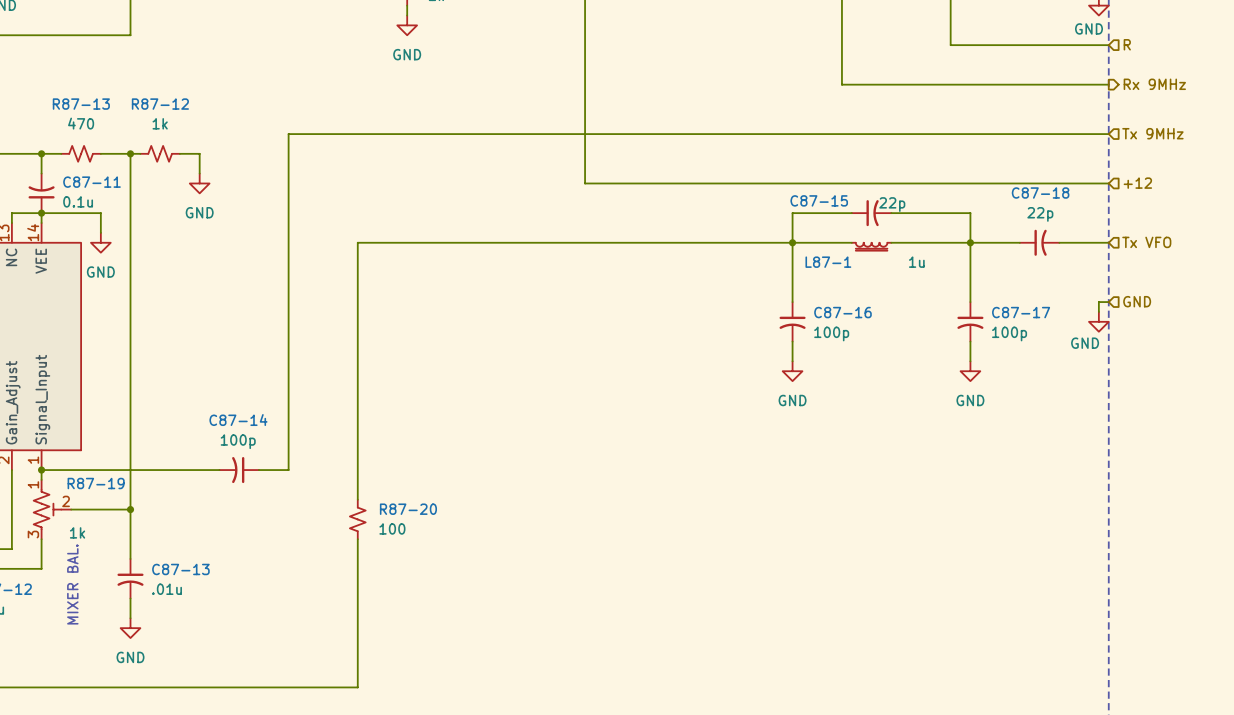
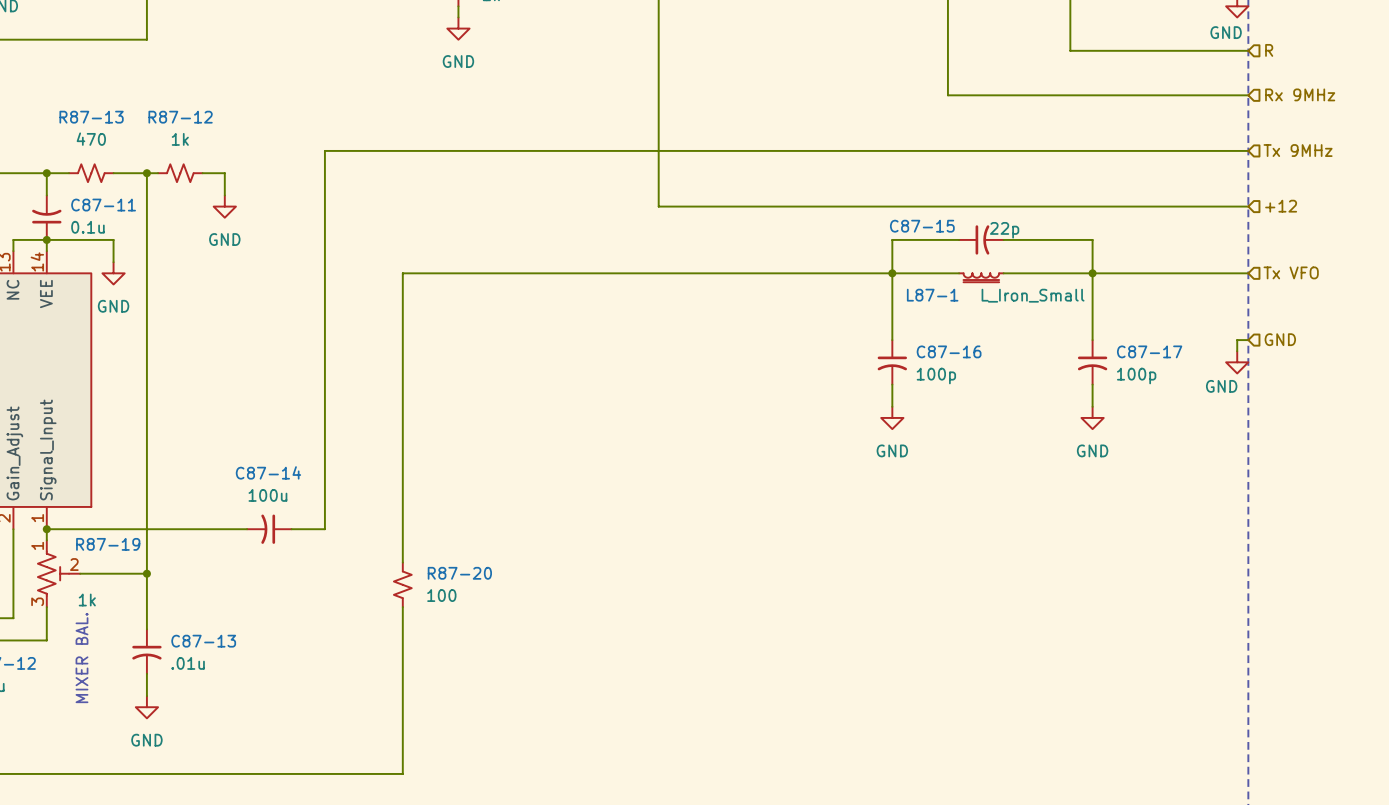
hierarchical label shape: output (1154, 84) -> input (1300, 94)
C87-18: 22p (1039, 242) -> none
L87-1 value: 1u (916, 262) -> L_Iron_Small (1033, 295)
C87-14 value: 100p (238, 441) -> 100u (267, 495)

